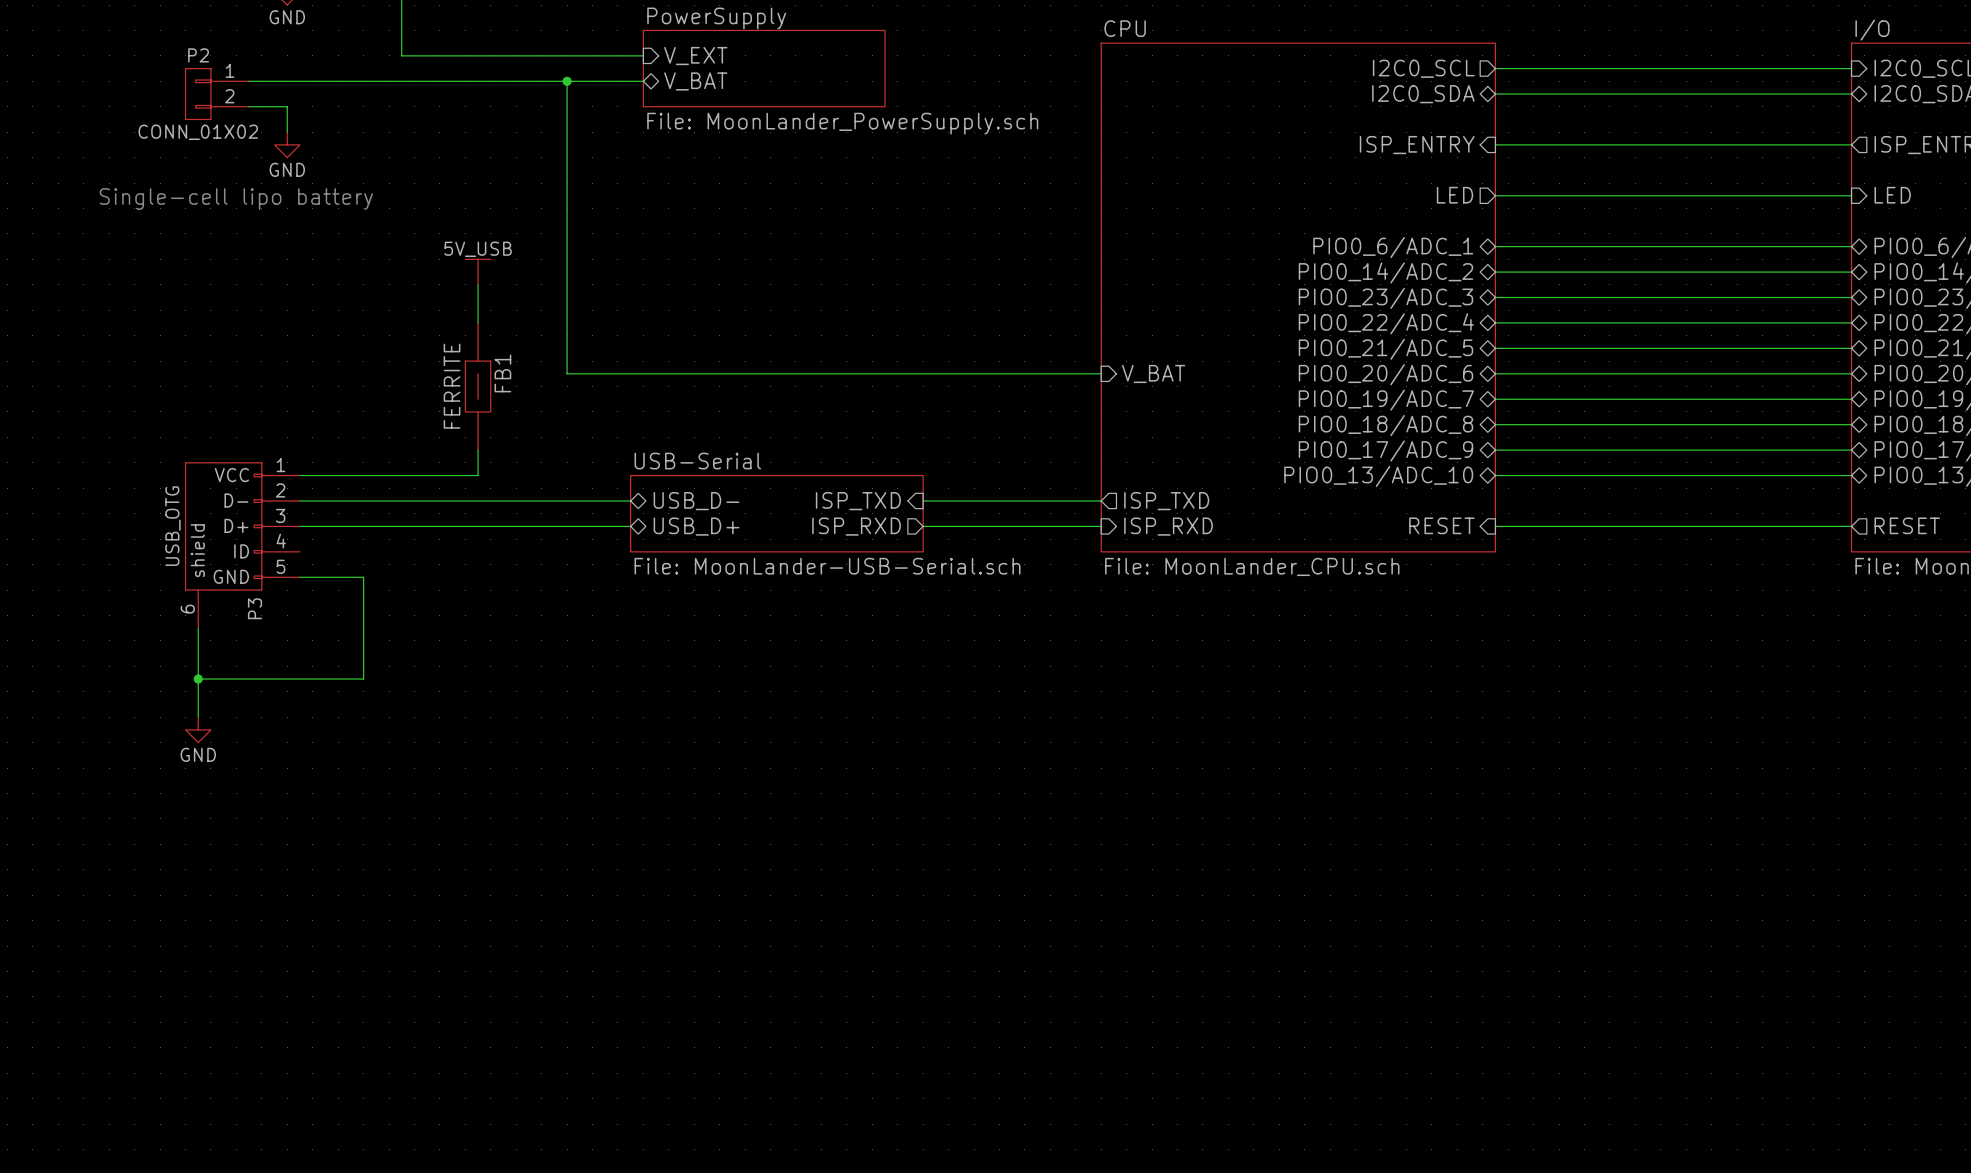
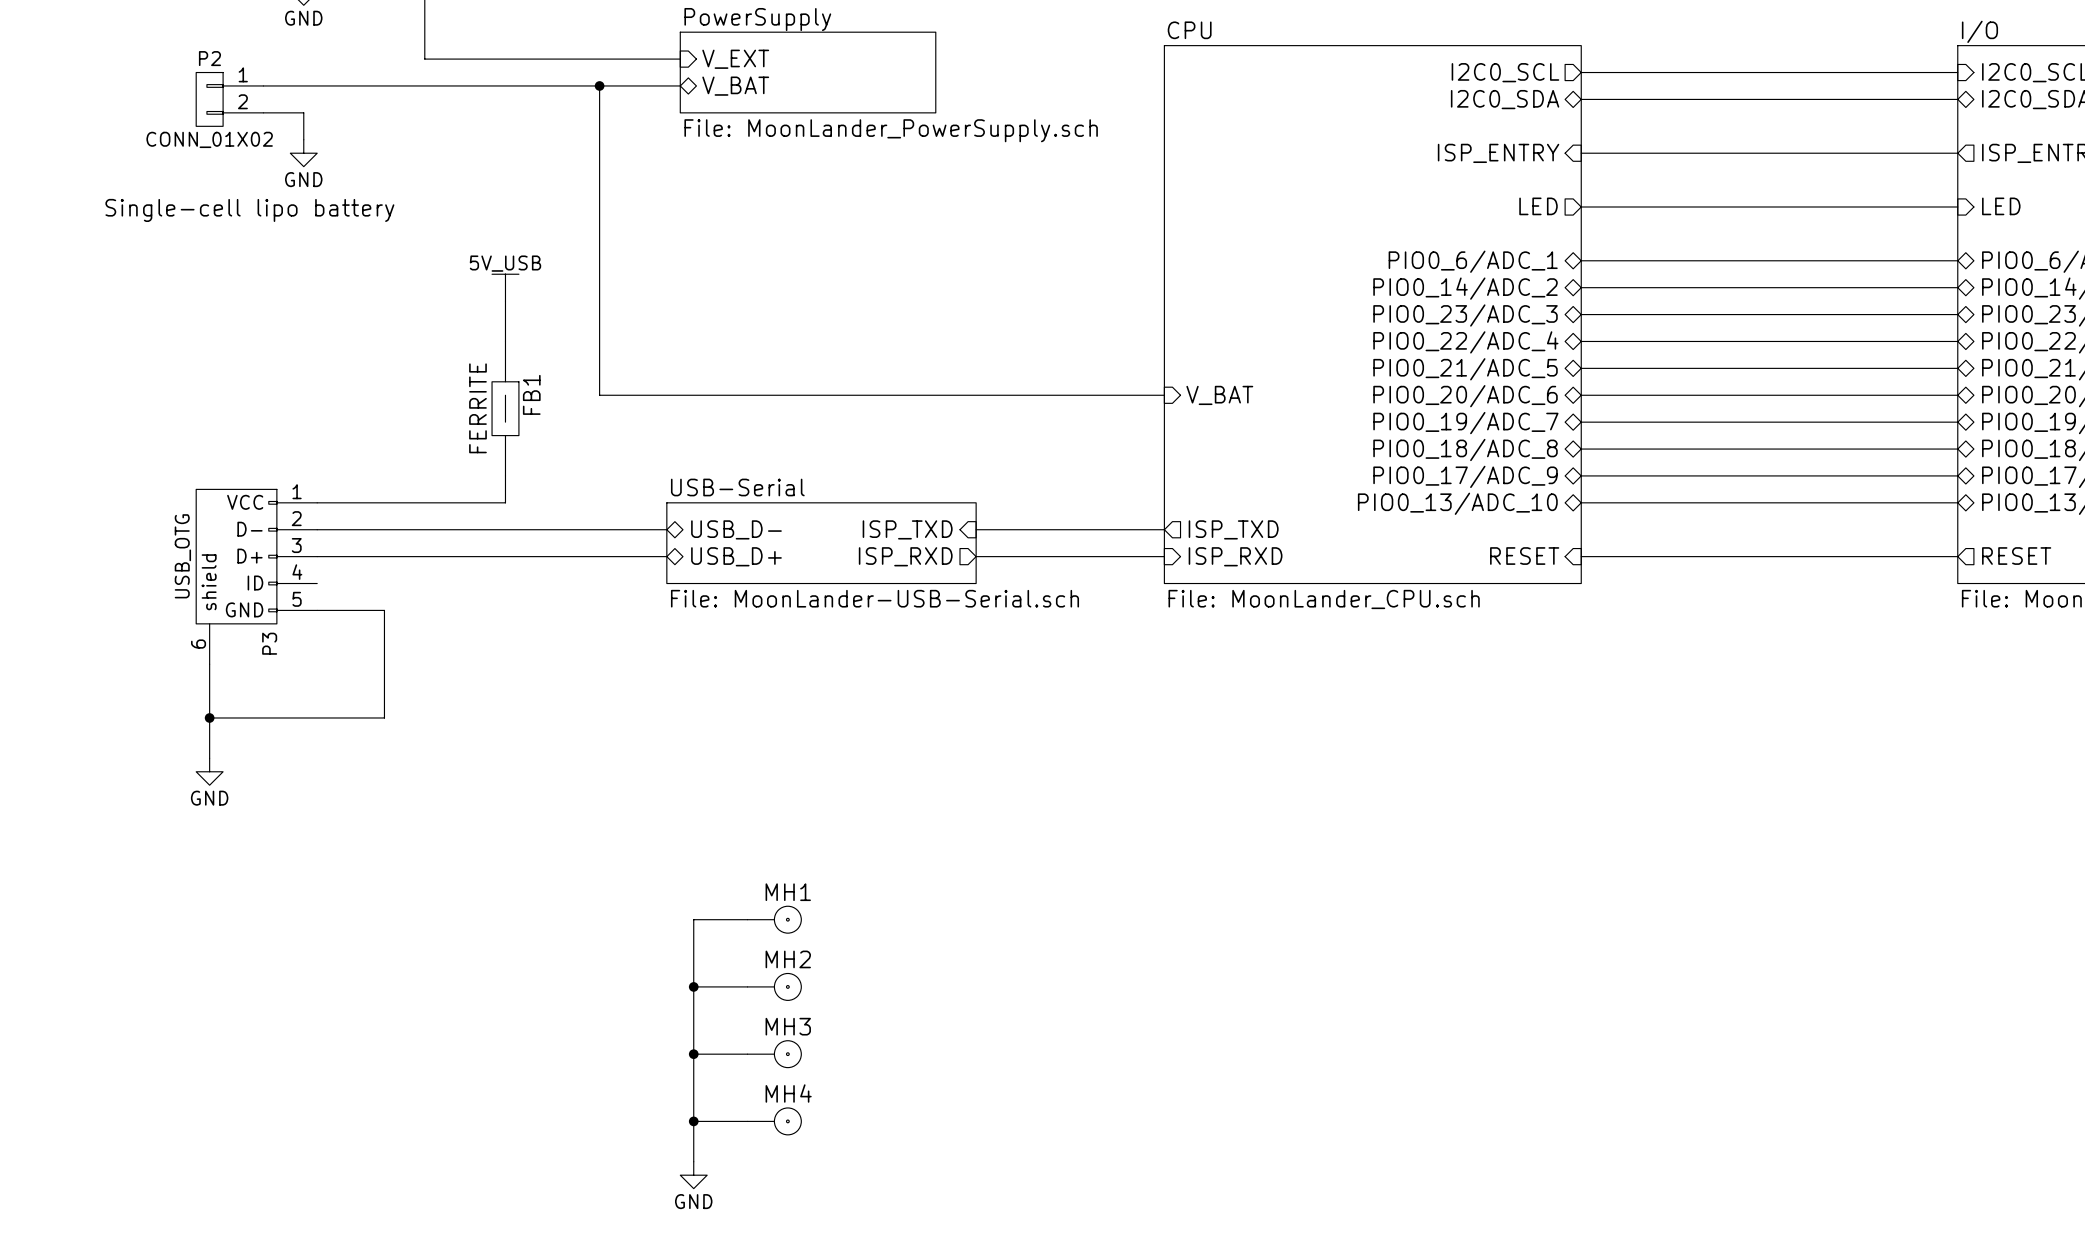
wire: none -> (747, 919) (693, 919) (693, 1161)
MH1: none -> (774, 919)
wire: none -> (693, 986) (747, 986)
junction: none -> (693, 986)
MH2: none -> (774, 986)
wire: none -> (693, 1054) (747, 1054)
junction: none -> (693, 1054)
MH3: none -> (774, 1054)
wire: none -> (693, 1121) (747, 1121)
junction: none -> (693, 1121)
MH4: none -> (774, 1121)
power symbol: none -> GND (693, 1175)

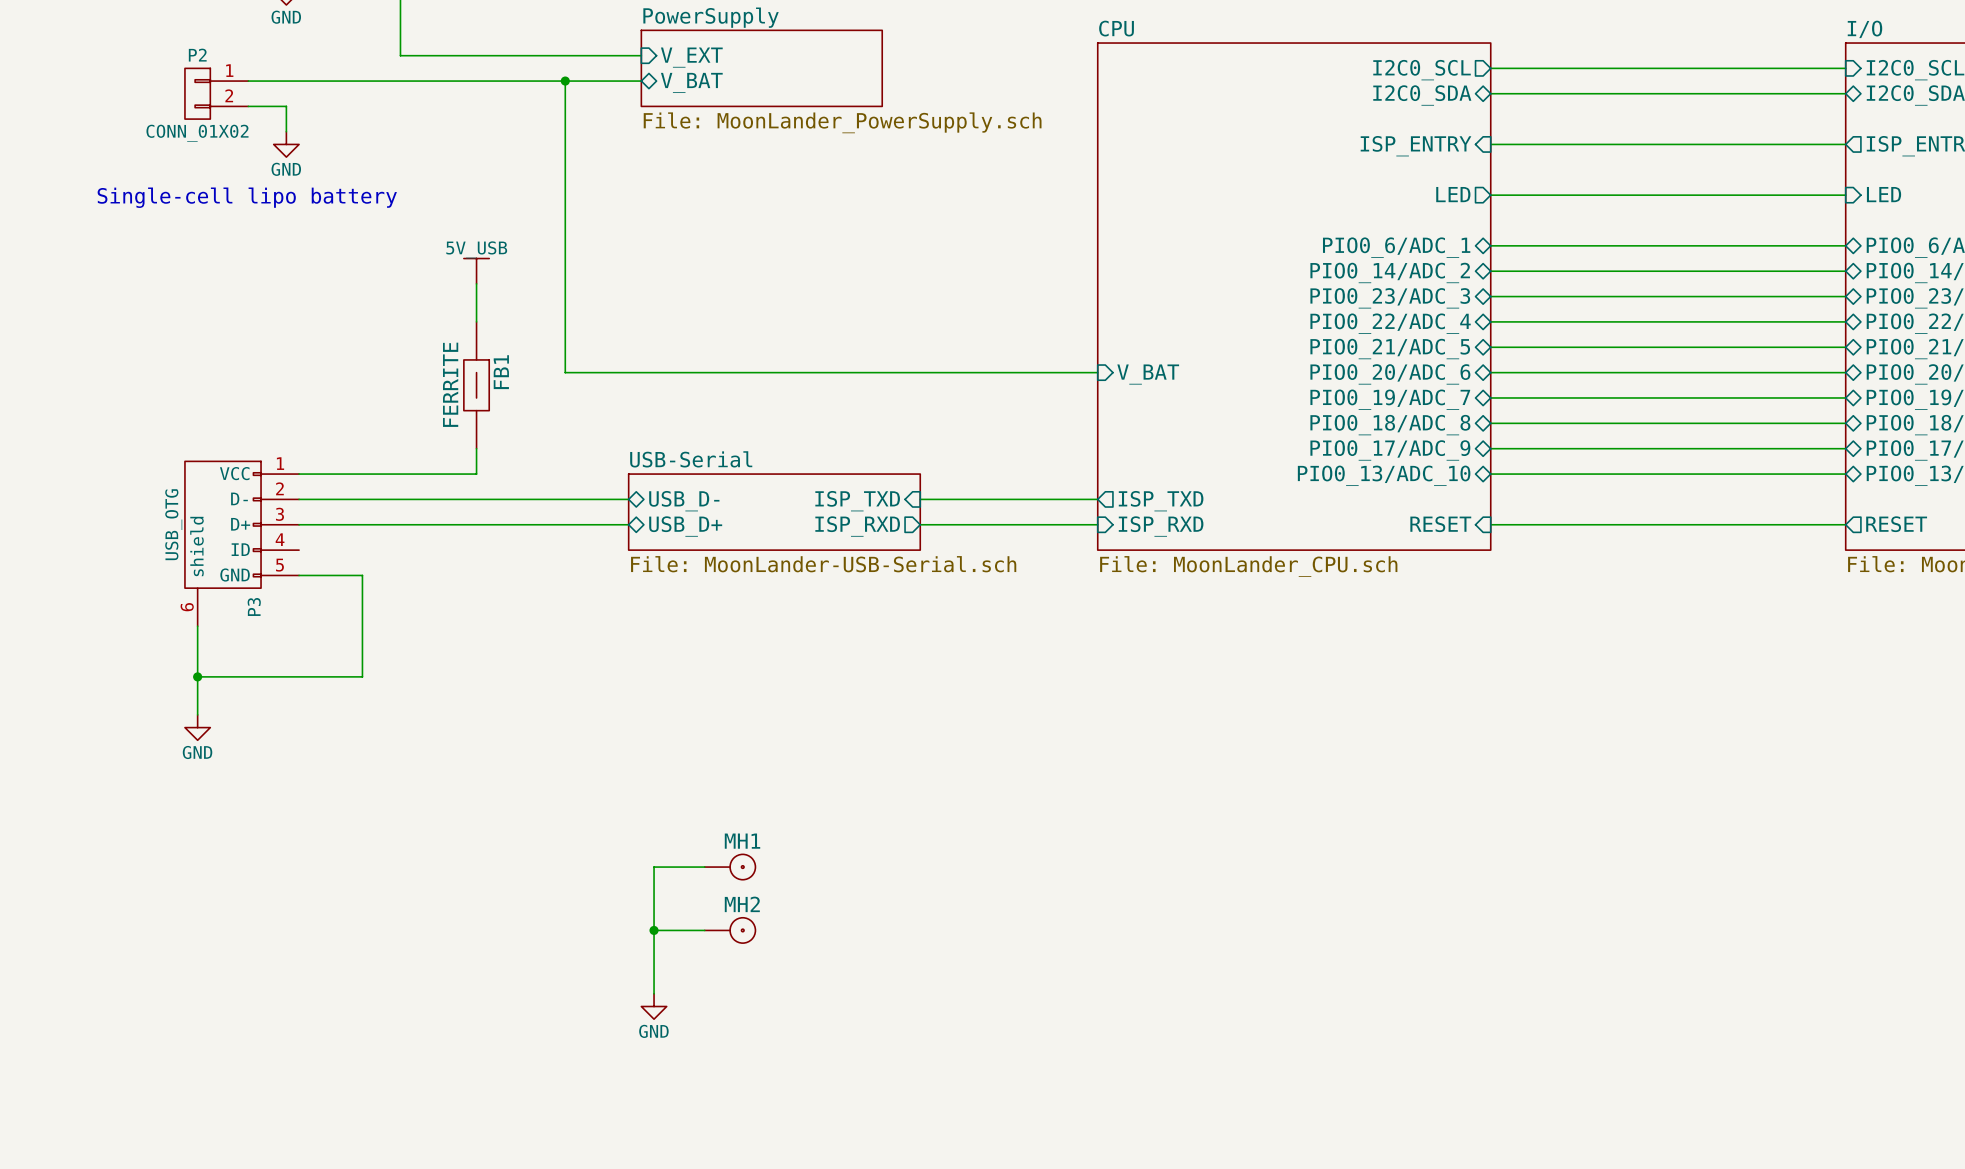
junction: (693, 1054) -> none
wire: (747, 1054) (693, 1054) (693, 1161) -> none
MH3: (774, 1054) -> none
wire: (693, 1121) (747, 1121) -> none
junction: (693, 1121) -> none
MH4: (774, 1121) -> none
power symbol position: GND (693, 1175) -> GND (654, 1006)

